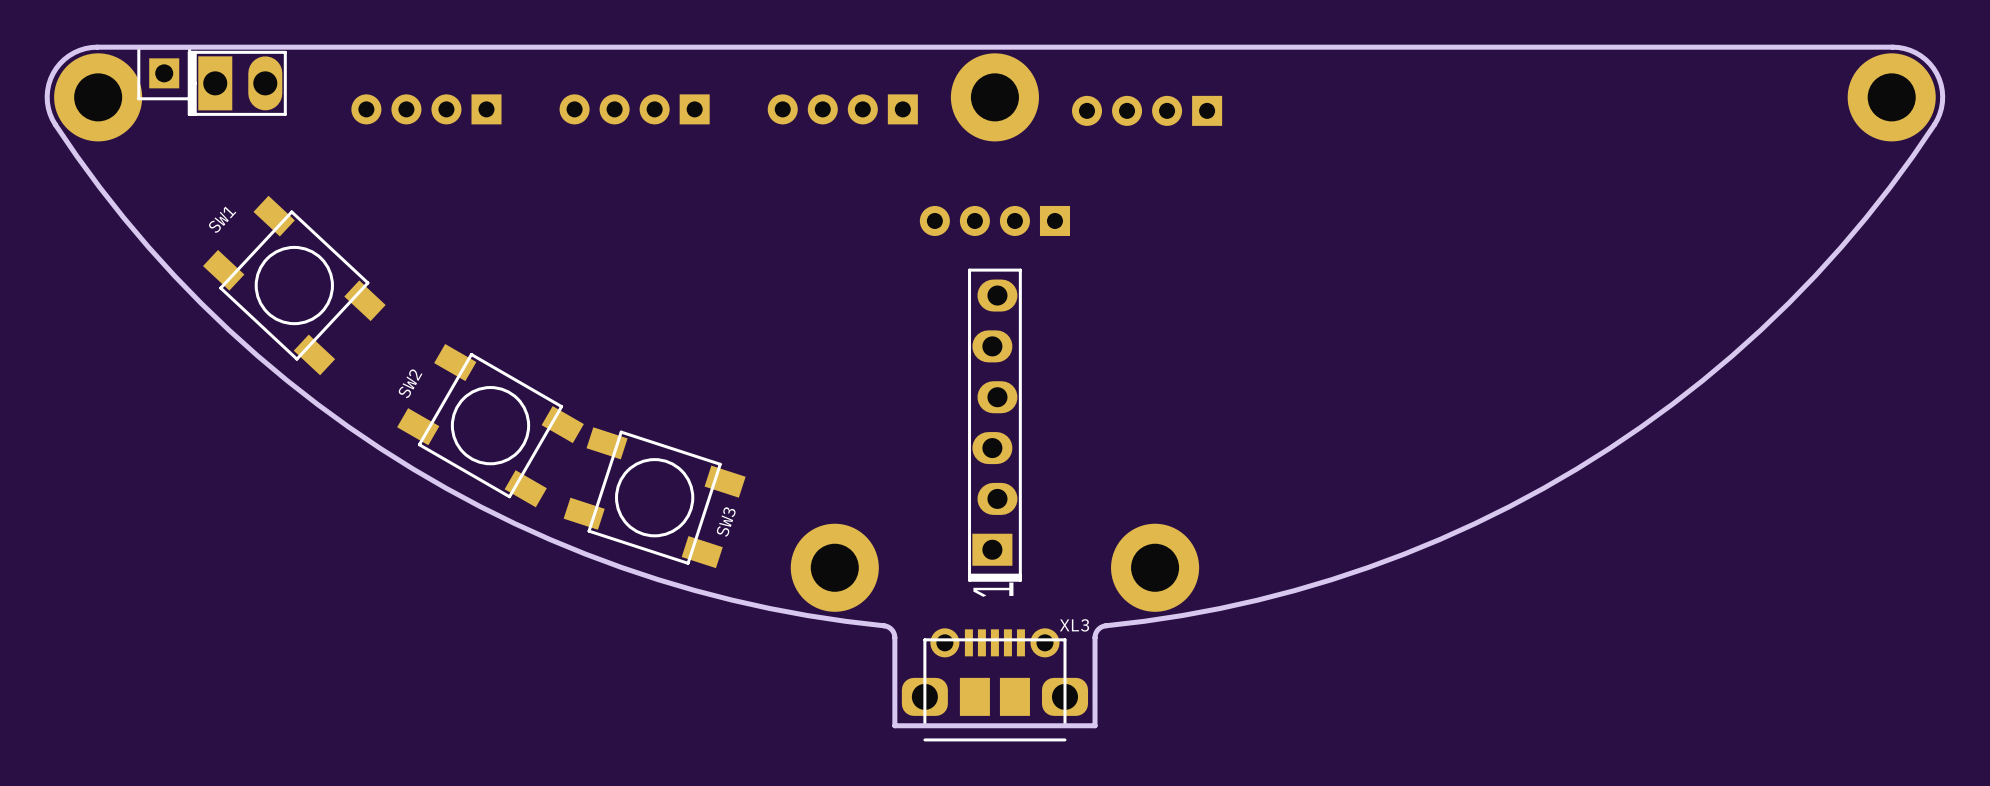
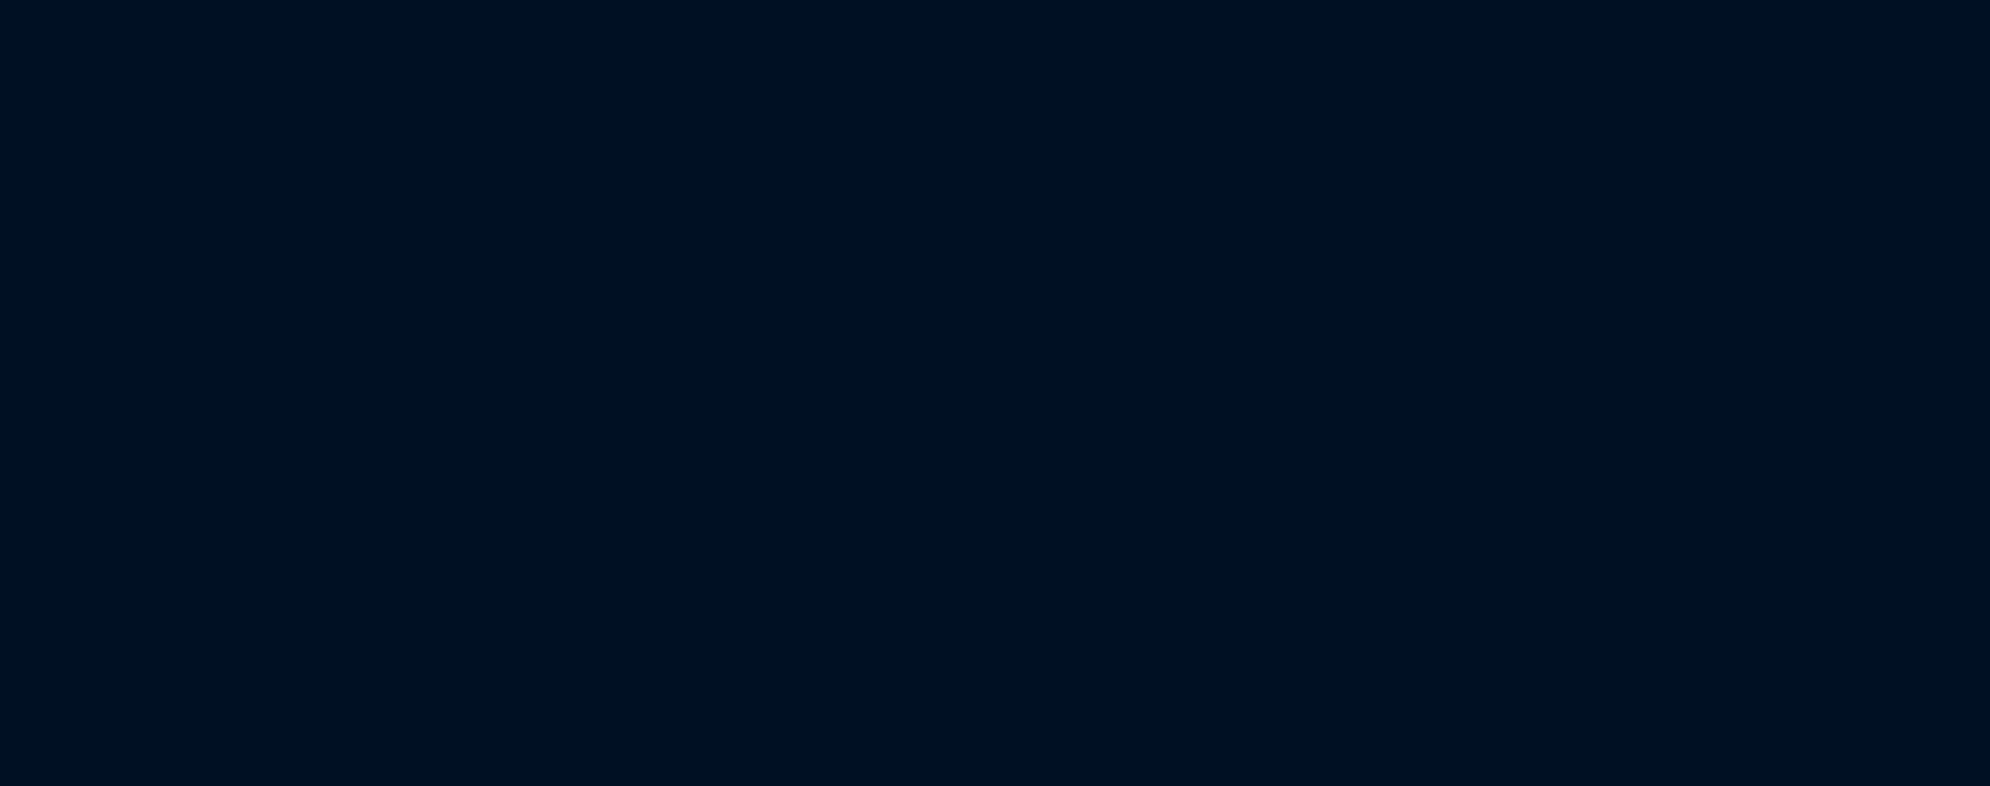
board edge: (97, 47) (1892, 47) (1910, 50) (1929, 63) (1939, 78) (1942, 96) (1941, 108) (1934, 124) (1889, 187) (1841, 247) (1788, 303) (1702, 380) (1641, 426) (1576, 469) (1475, 523) (1404, 554) (1331, 579) (1220, 608) (1101, 627) (1095, 636) (1095, 725) (894, 725) (894, 636) (888, 627) (769, 608) (695, 590) (621, 567) (549, 539) (446, 488) (380, 448) (317, 404) (257, 355) (201, 303) (148, 247) (99, 187) (52, 119) (47, 102) (47, 90) (56, 68) (74, 52) (97, 47) -> none
part: (164, 73) -> none
part: (237, 83) -> none
part: (98, 97) -> none
part: (994, 97) -> none
part: (1891, 97) -> none
part: (426, 109) -> none
part: (634, 109) -> none
part: (842, 109) -> none
part: (1147, 110) -> none
part: (994, 220) -> none
SW1: (294, 285) -> none
SW2: (490, 425) -> none
part: (994, 425) -> none
SW3: (654, 497) -> none
part: (834, 567) -> none
part: (1155, 567) -> none
XL3: (994, 684) -> none

